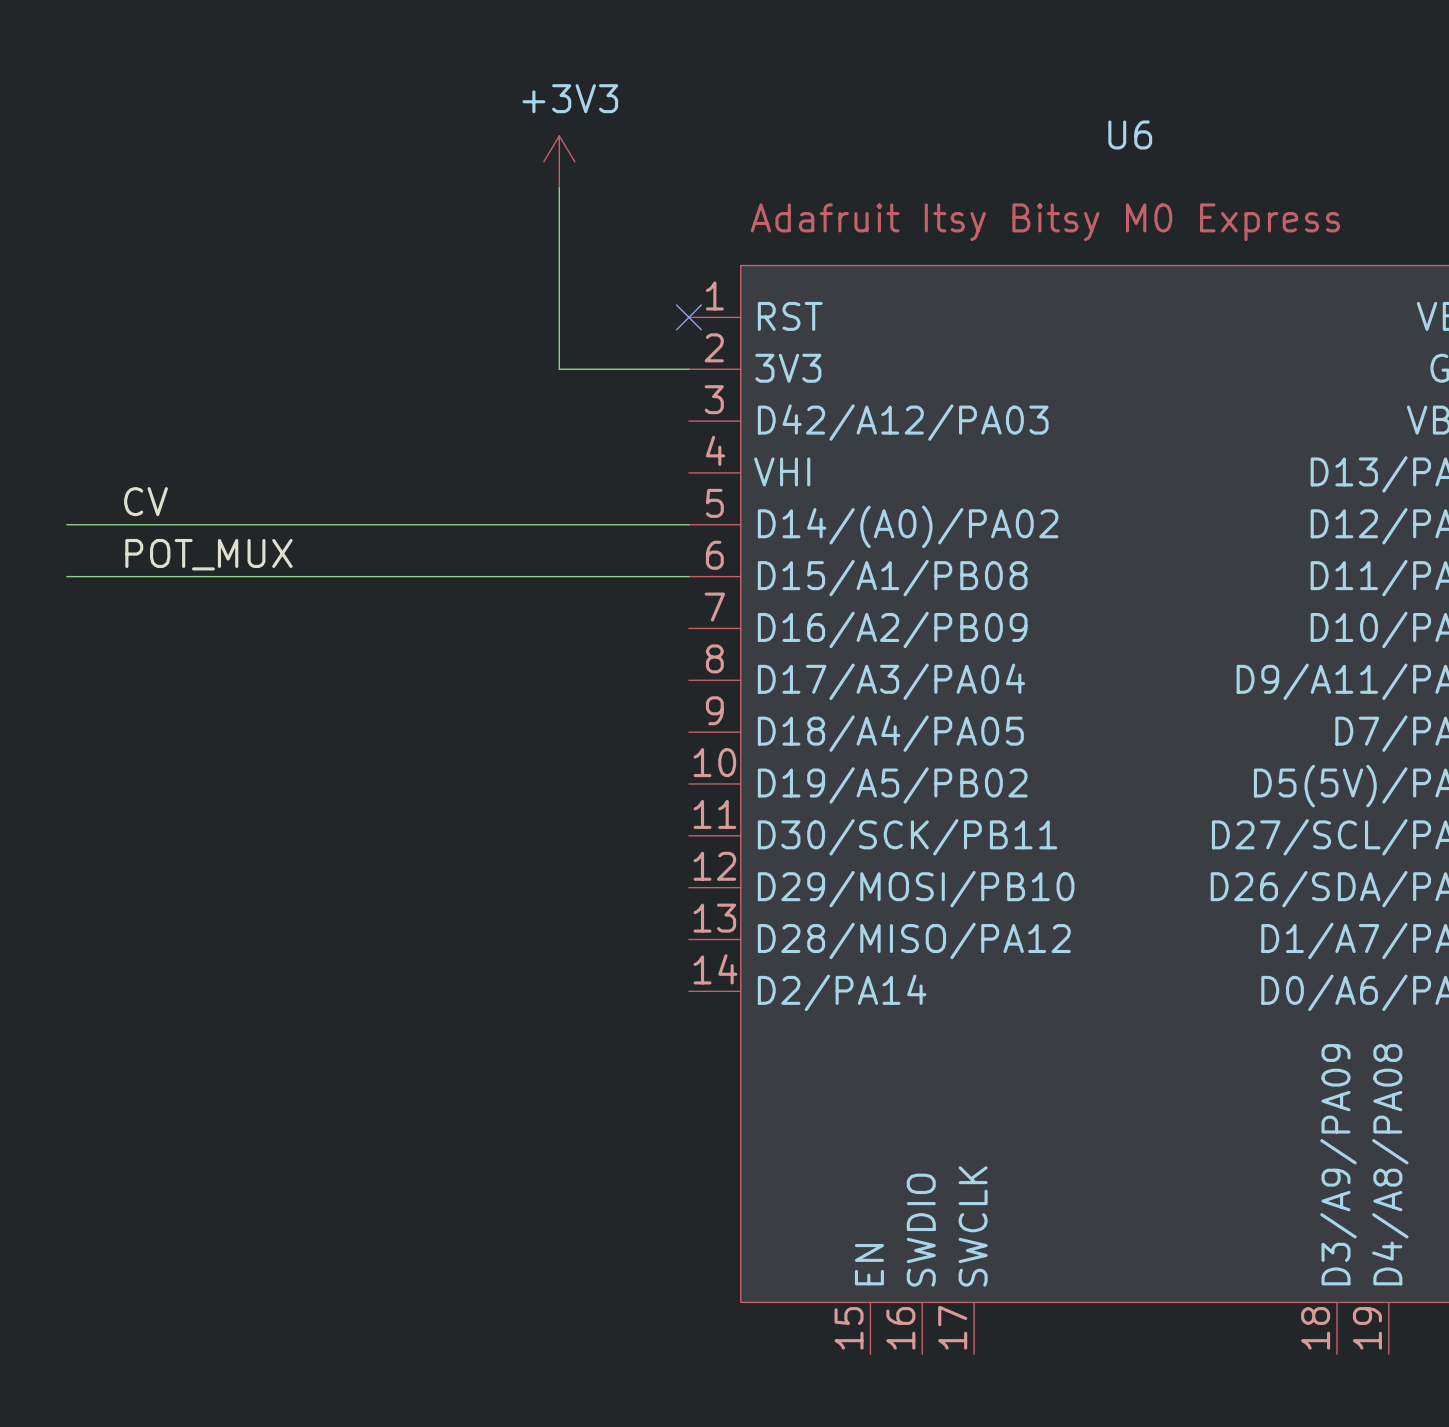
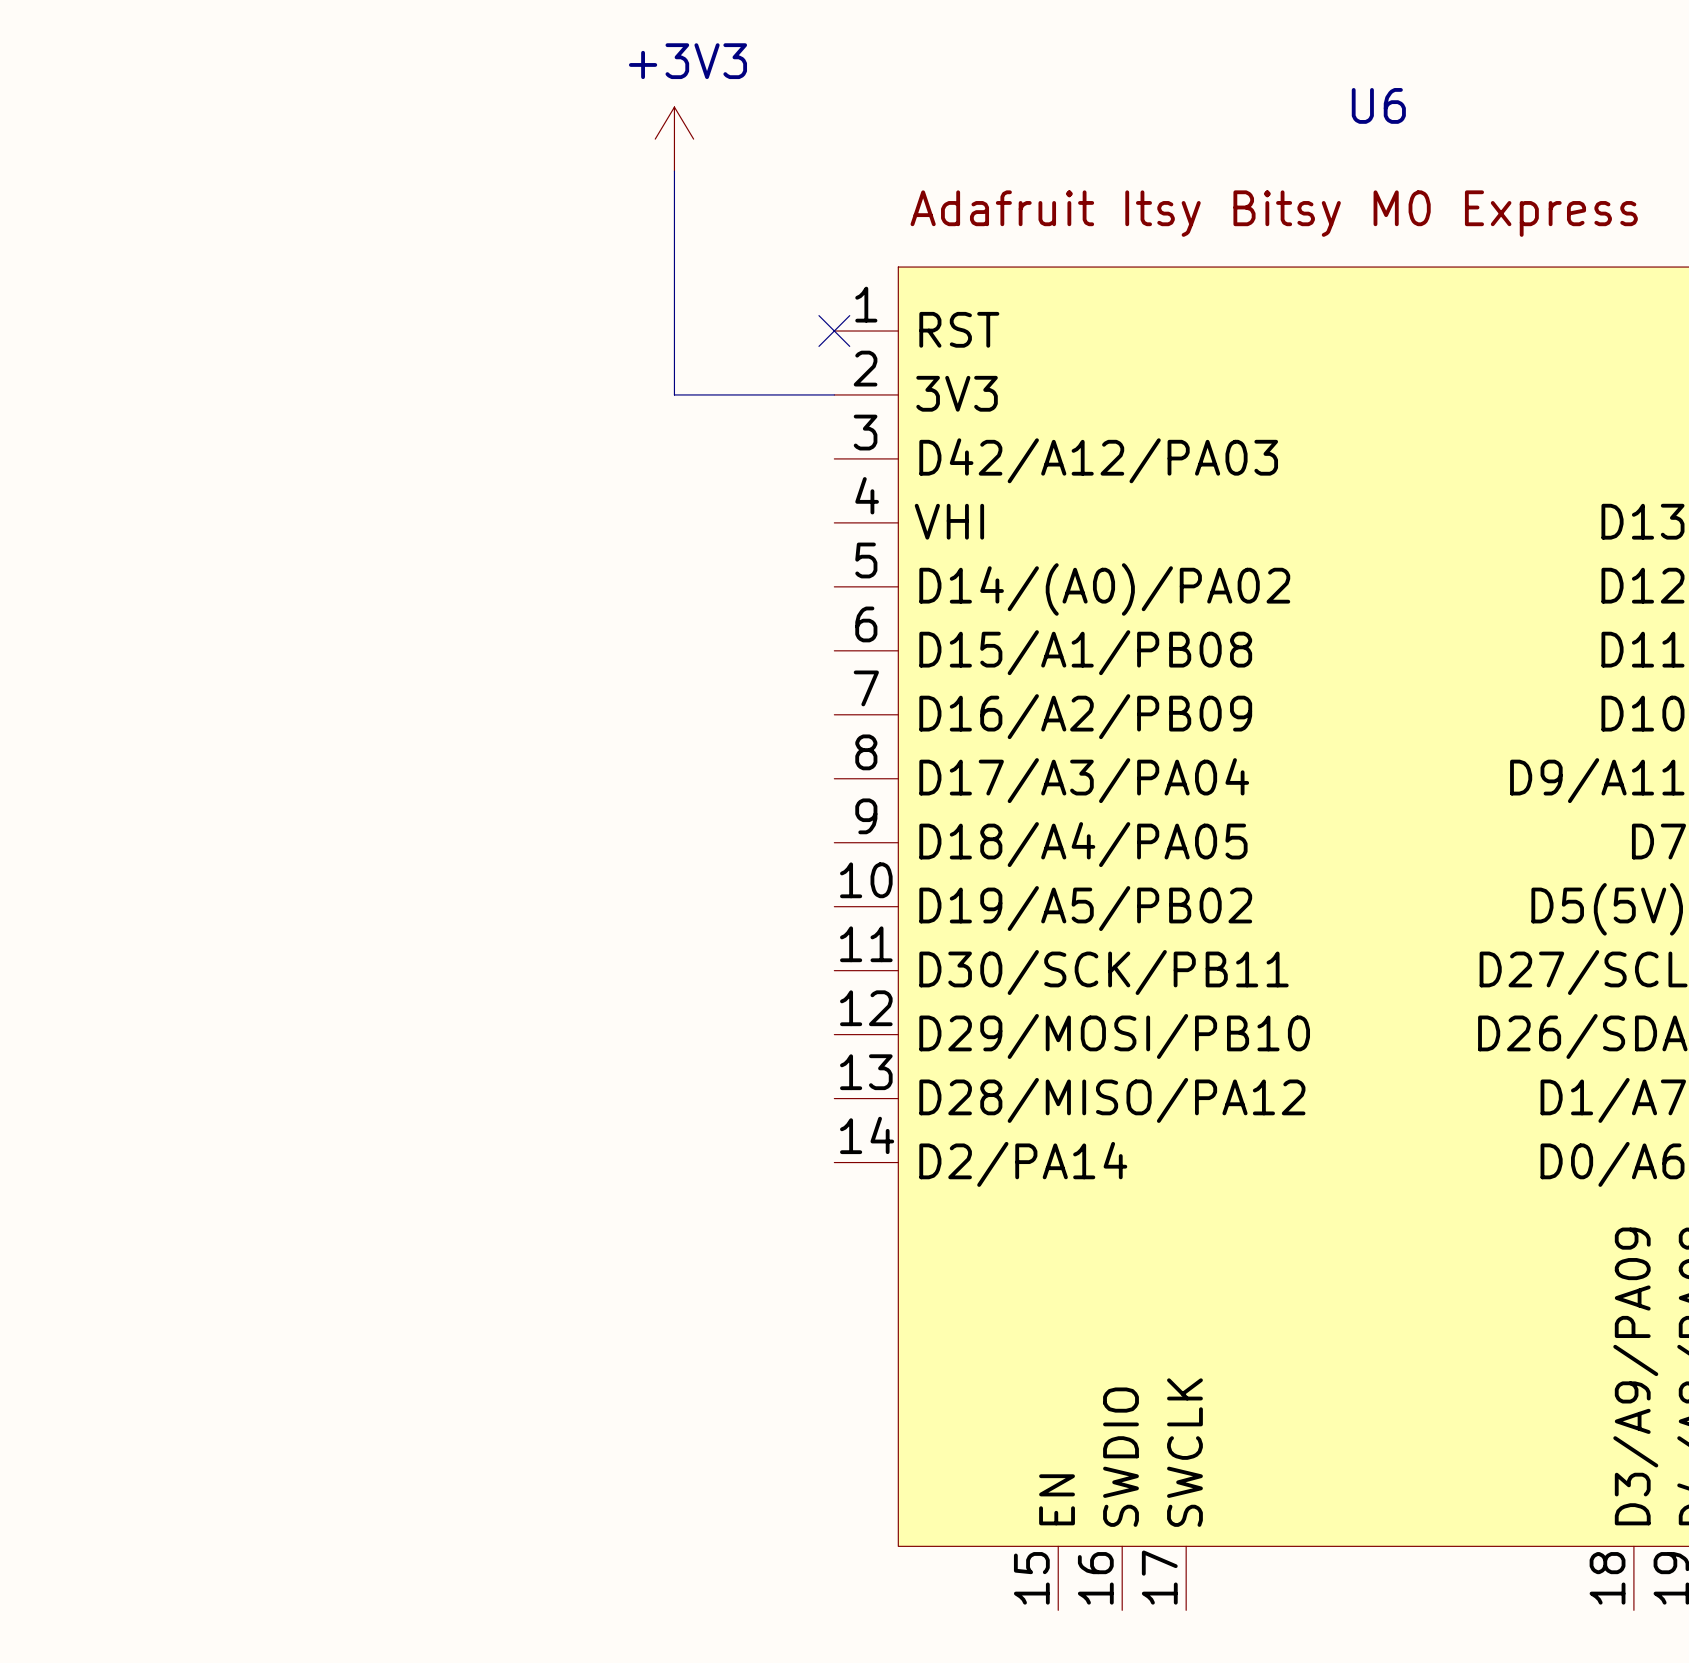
label: CV (146, 501) -> none
wire: (66, 524) (688, 524) -> none
label: POT_MUX (208, 554) -> none
wire: (66, 576) (688, 576) -> none

